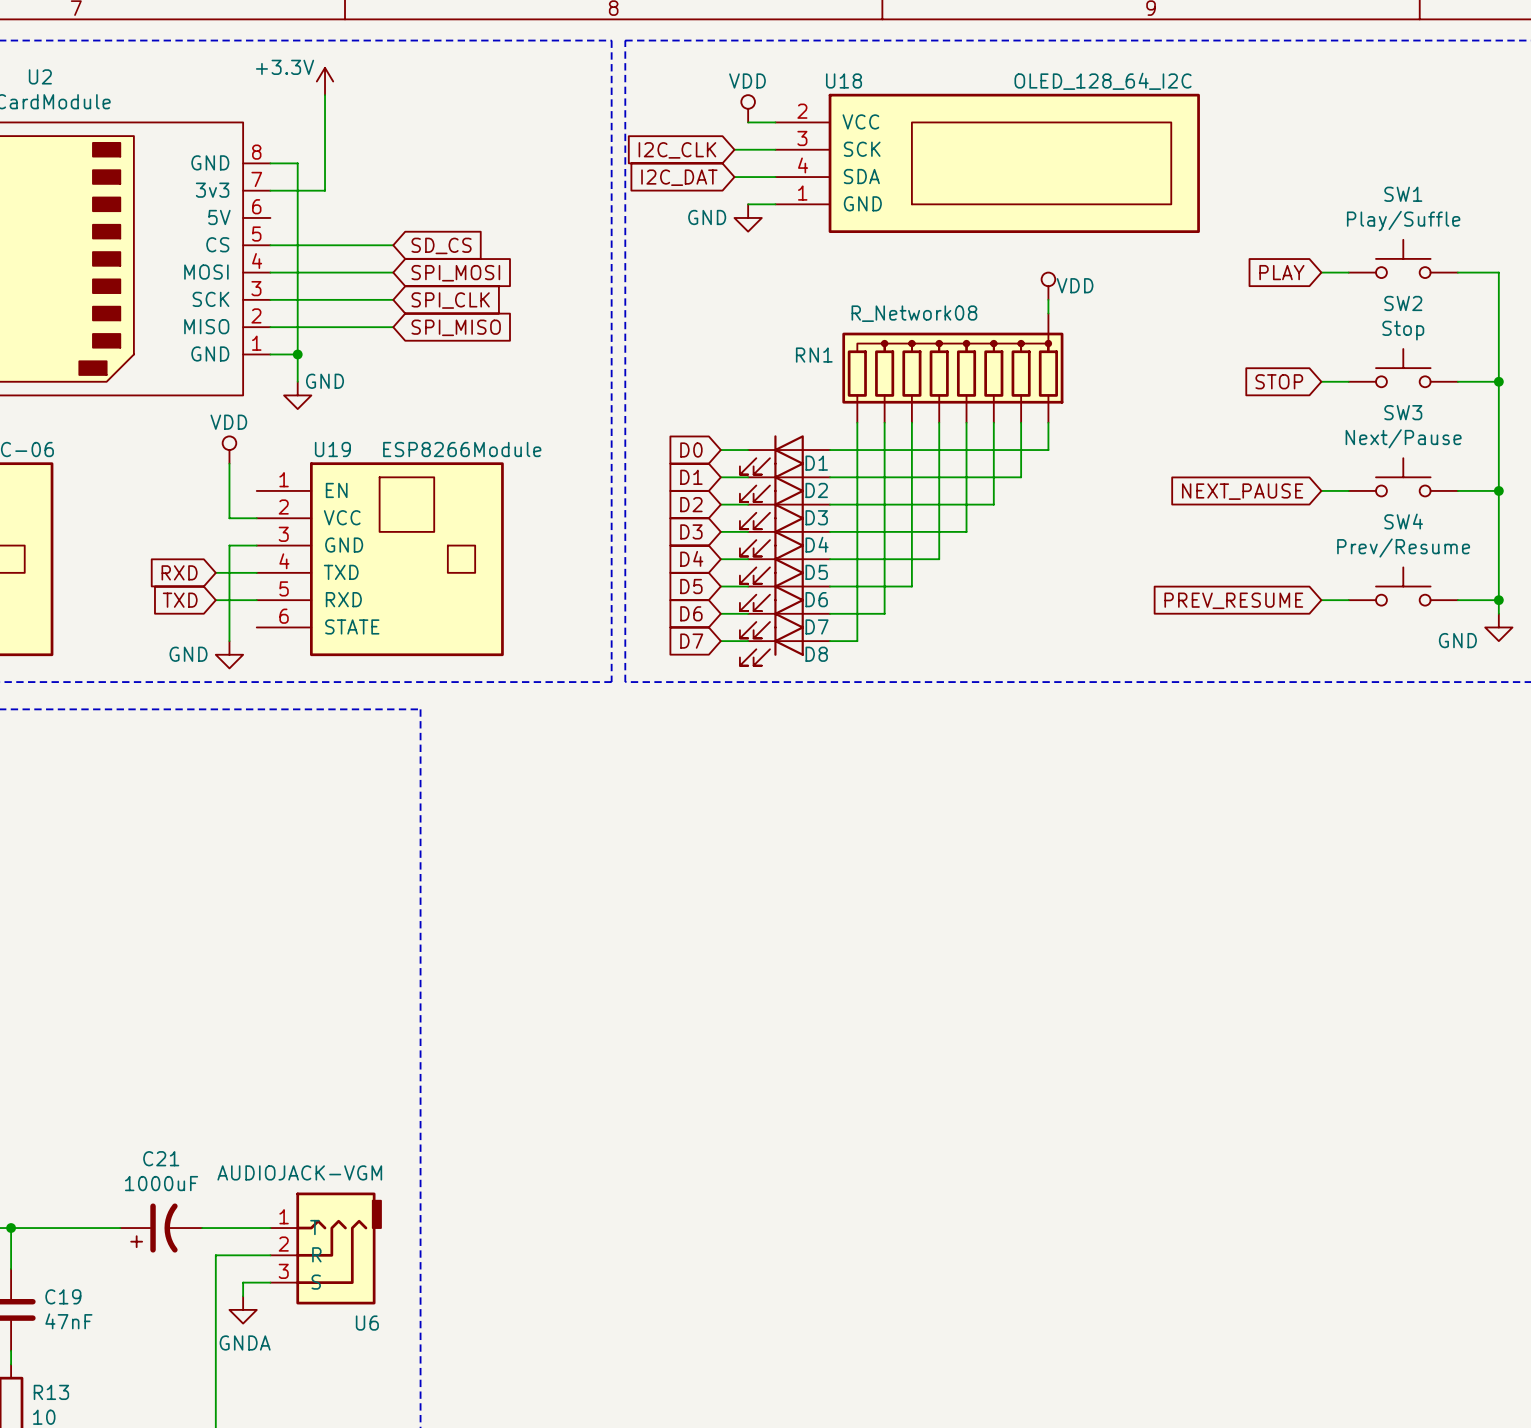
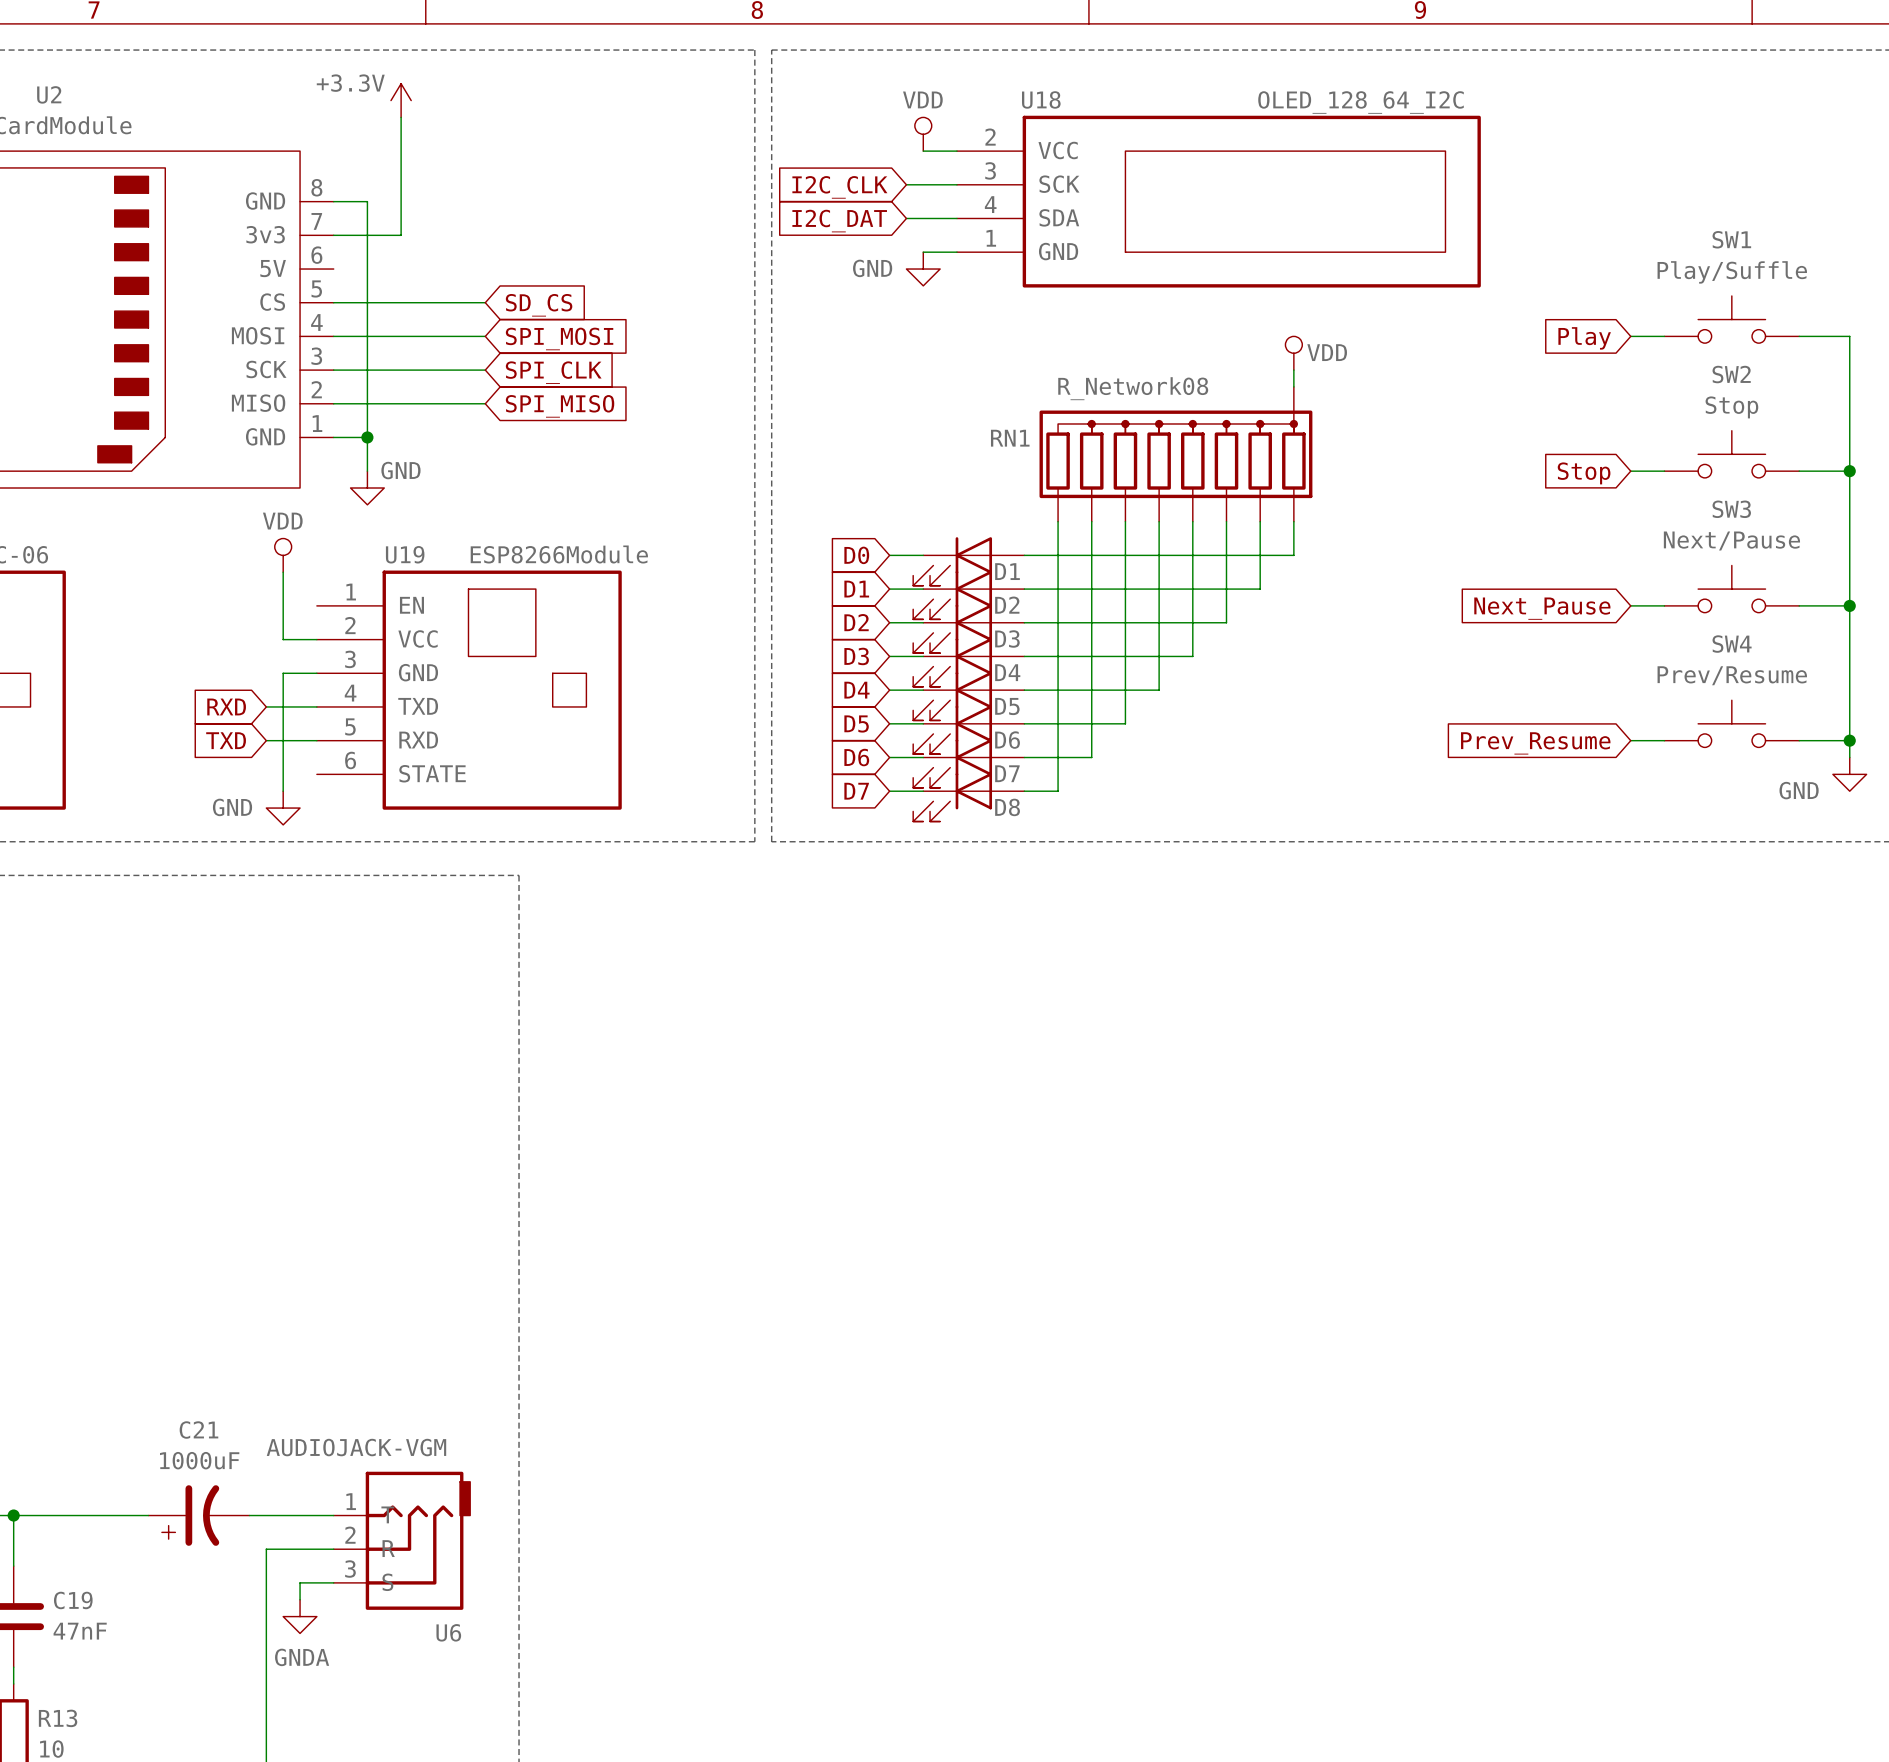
global label: PLAY (1281, 272) -> Play (1584, 338)
global label: STOP (1279, 381) -> Stop (1584, 473)
global label: NEXT_PAUSE (1242, 491) -> Next_Pause (1542, 608)
global label: PREV_RESUME (1233, 600) -> Prev_Resume (1535, 743)

